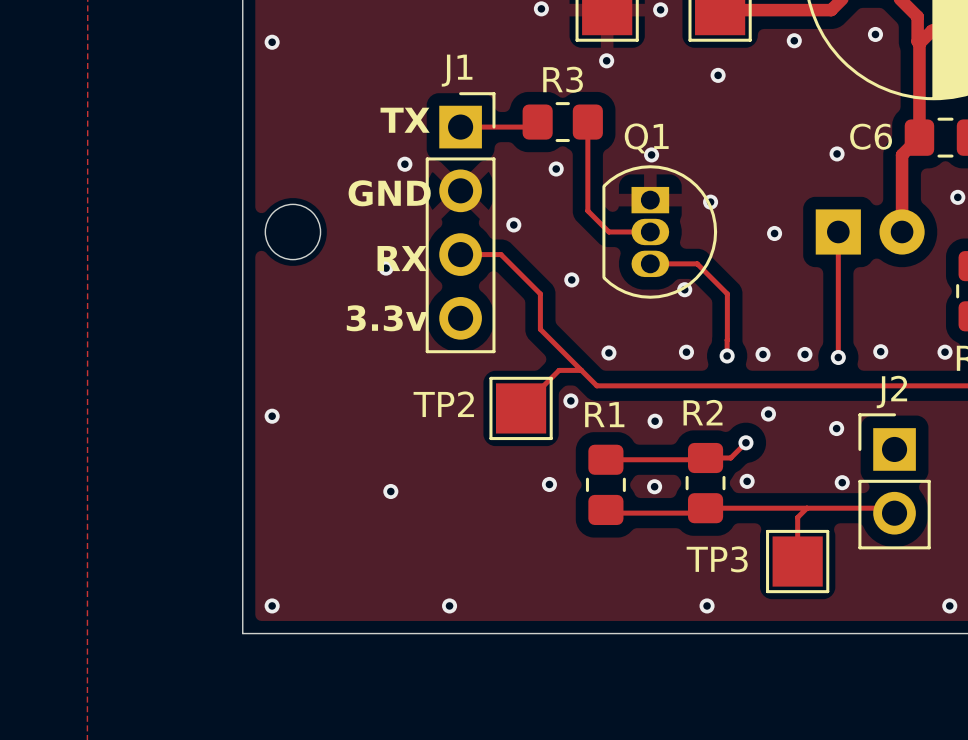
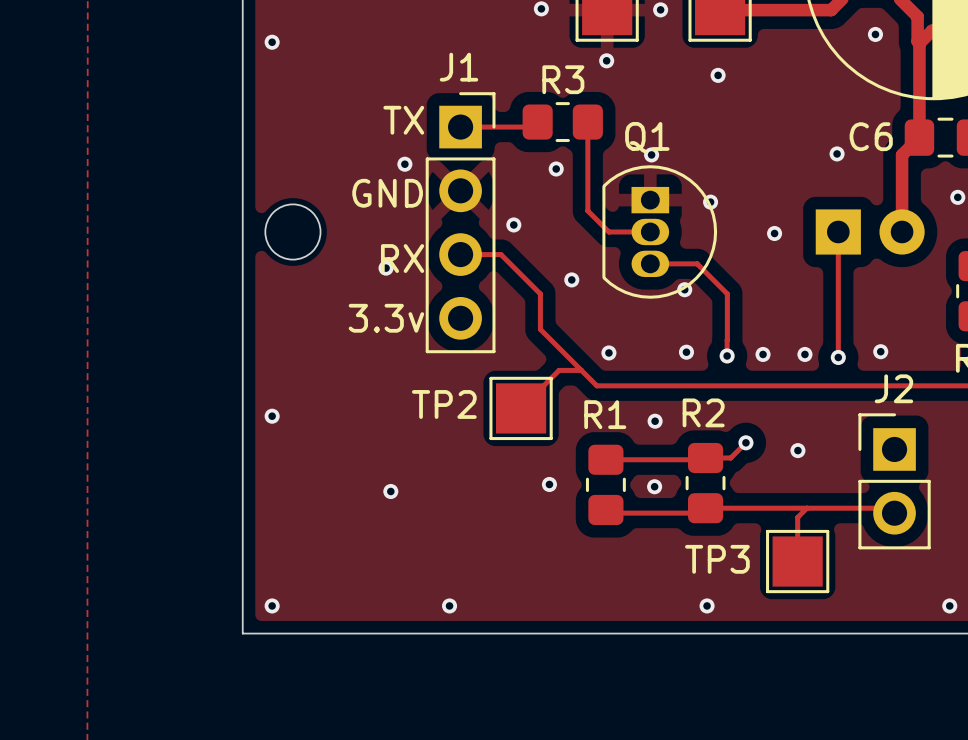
via: (794, 40) -> none
via: (945, 352) -> none
via: (570, 400) -> none
via: (768, 414) -> none
via: (836, 428) -> none
via: none -> (797, 450)
via: (747, 481) -> none
via: (842, 482) -> none

